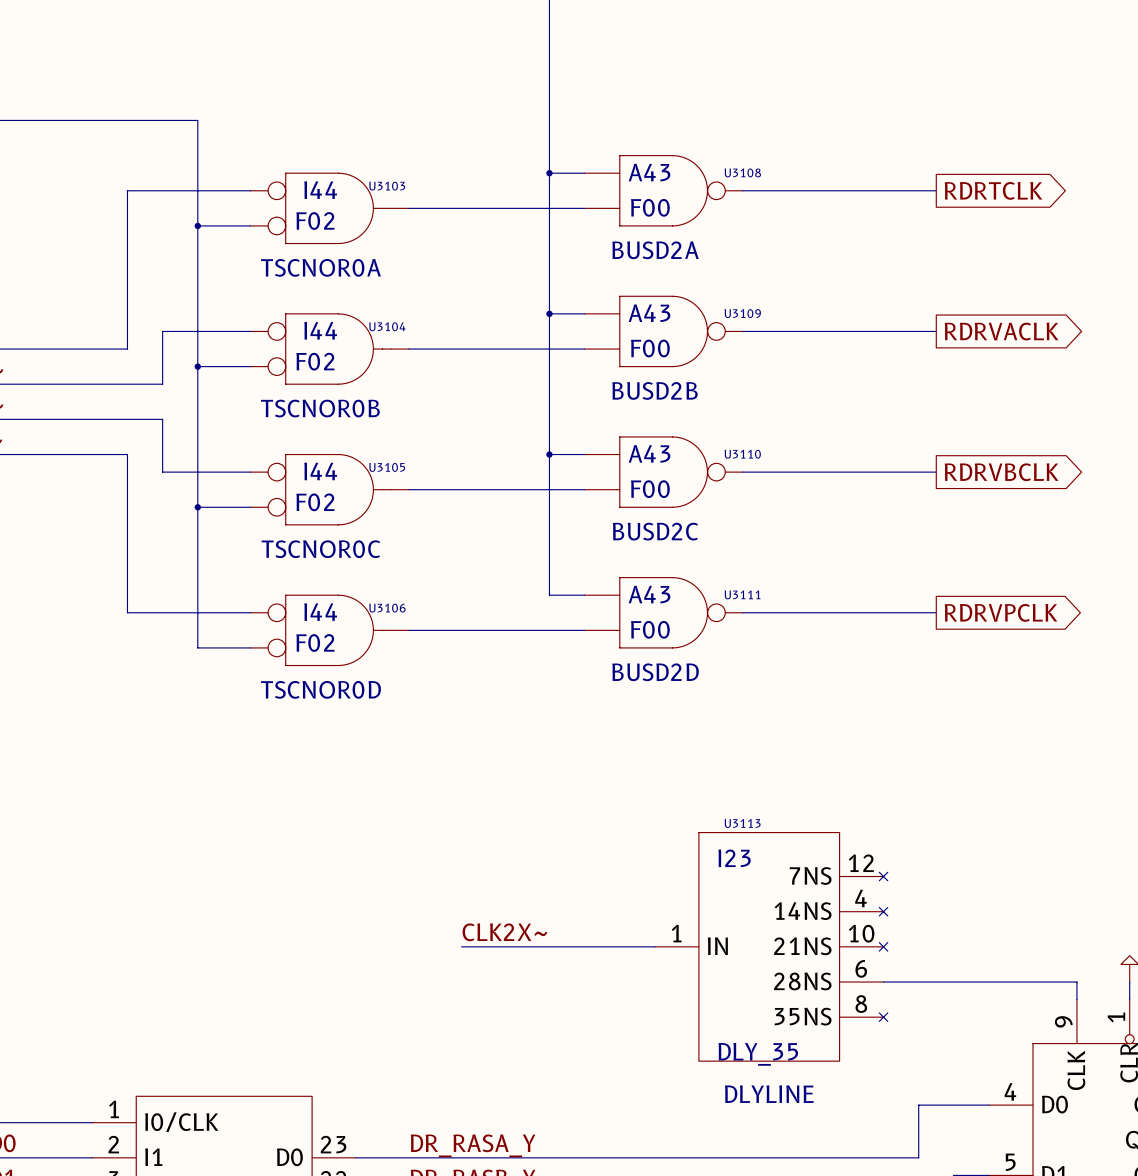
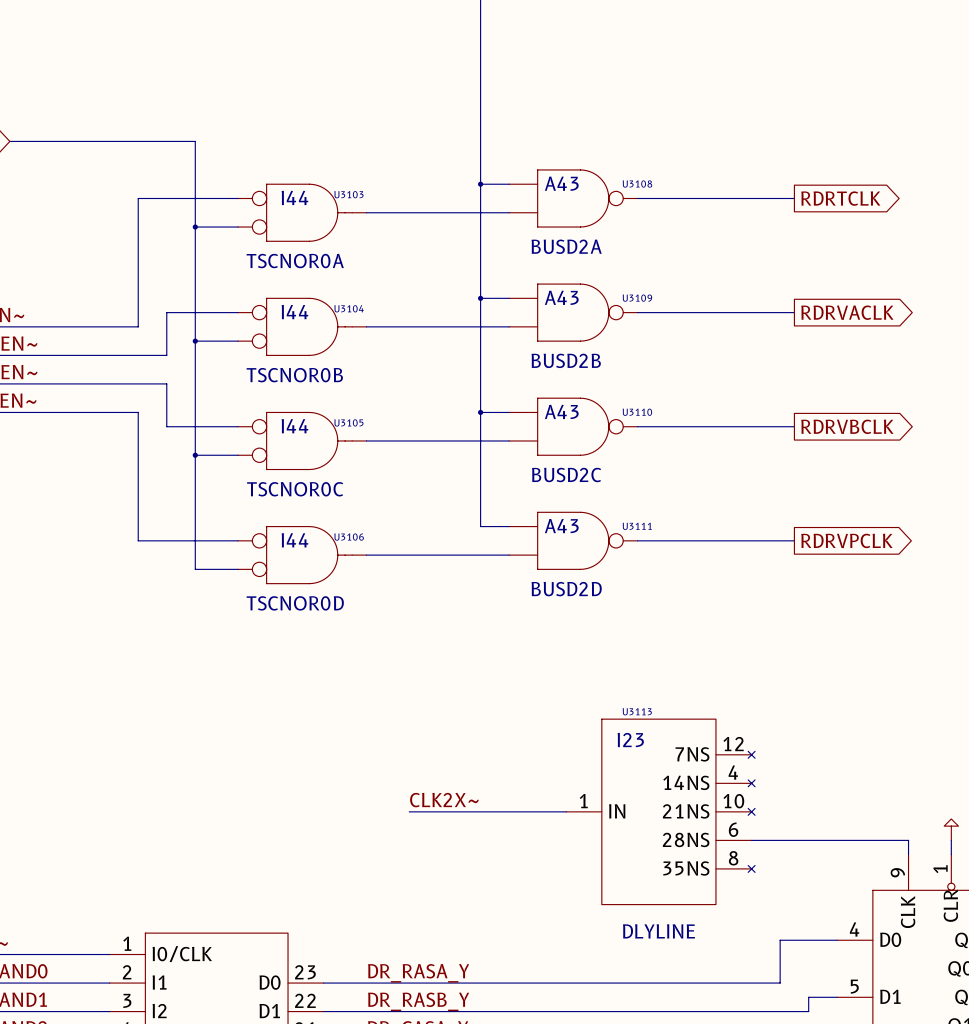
U3108 value: F00 (650, 207) -> none
U3103 value: F02 (315, 221) -> none
U3109 value: F00 (650, 348) -> none
U3104 value: F02 (315, 361) -> none
U3110 value: F00 (650, 489) -> none
U3105 value: F02 (315, 502) -> none
U3111 value: F00 (650, 629) -> none
U3106 value: F02 (315, 643) -> none
U3113 value: DLY_35 (758, 1054) -> none

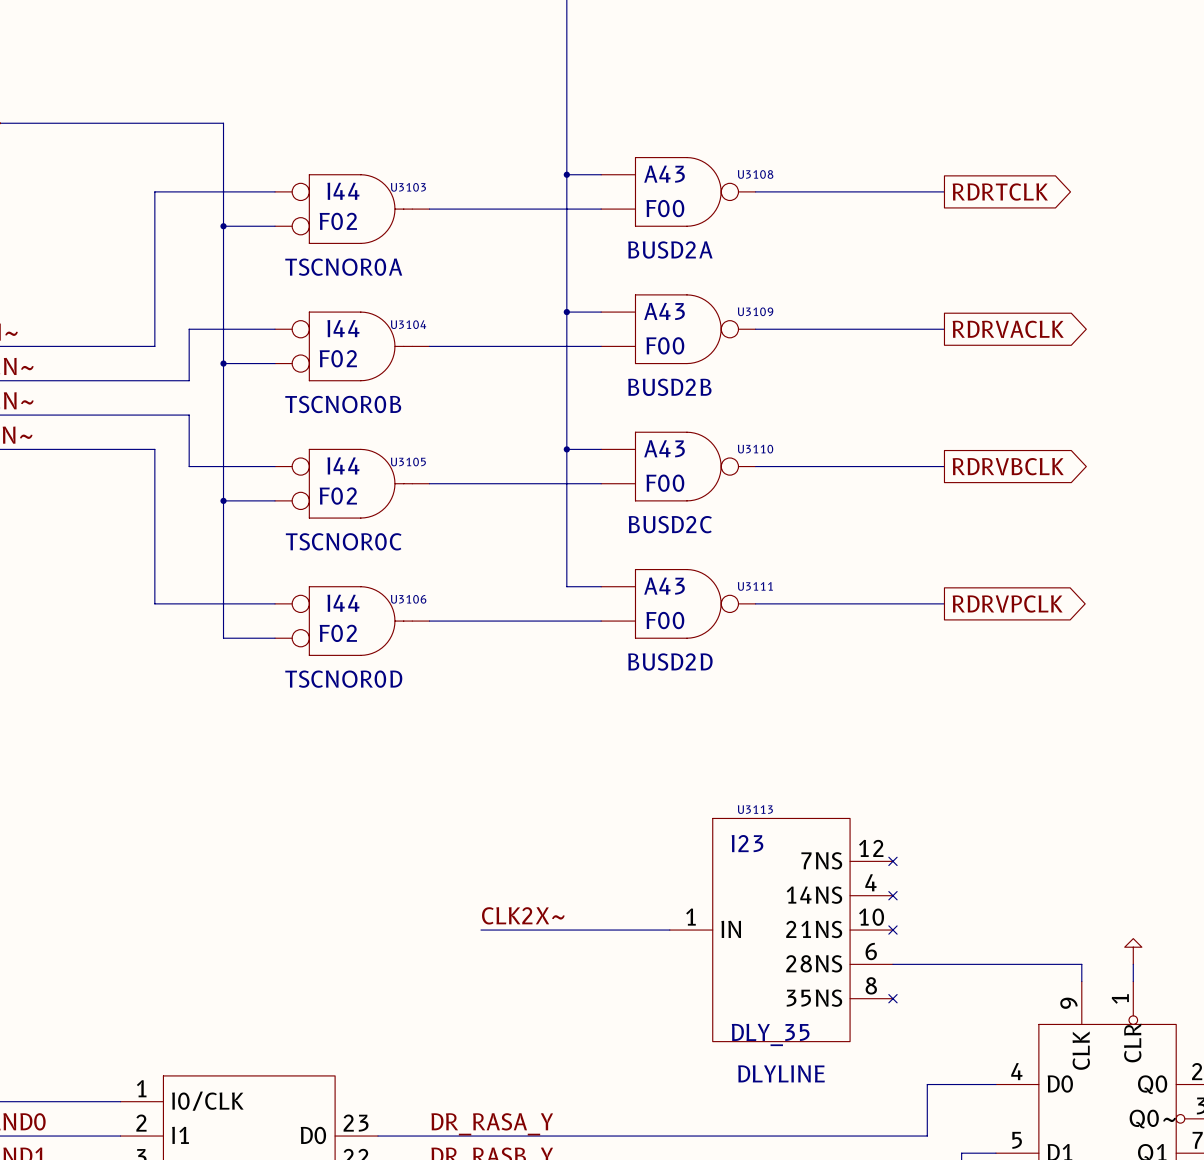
U3108 value: none -> F00 (665, 208)
U3103 value: none -> F02 (338, 221)
U3109 value: none -> F00 (665, 345)
U3104 value: none -> F02 (338, 358)
U3110 value: none -> F00 (665, 483)
U3105 value: none -> F02 (338, 496)
U3111 value: none -> F00 (665, 620)
U3106 value: none -> F02 (338, 633)
U3113 value: none -> DLY_35 (770, 1034)

